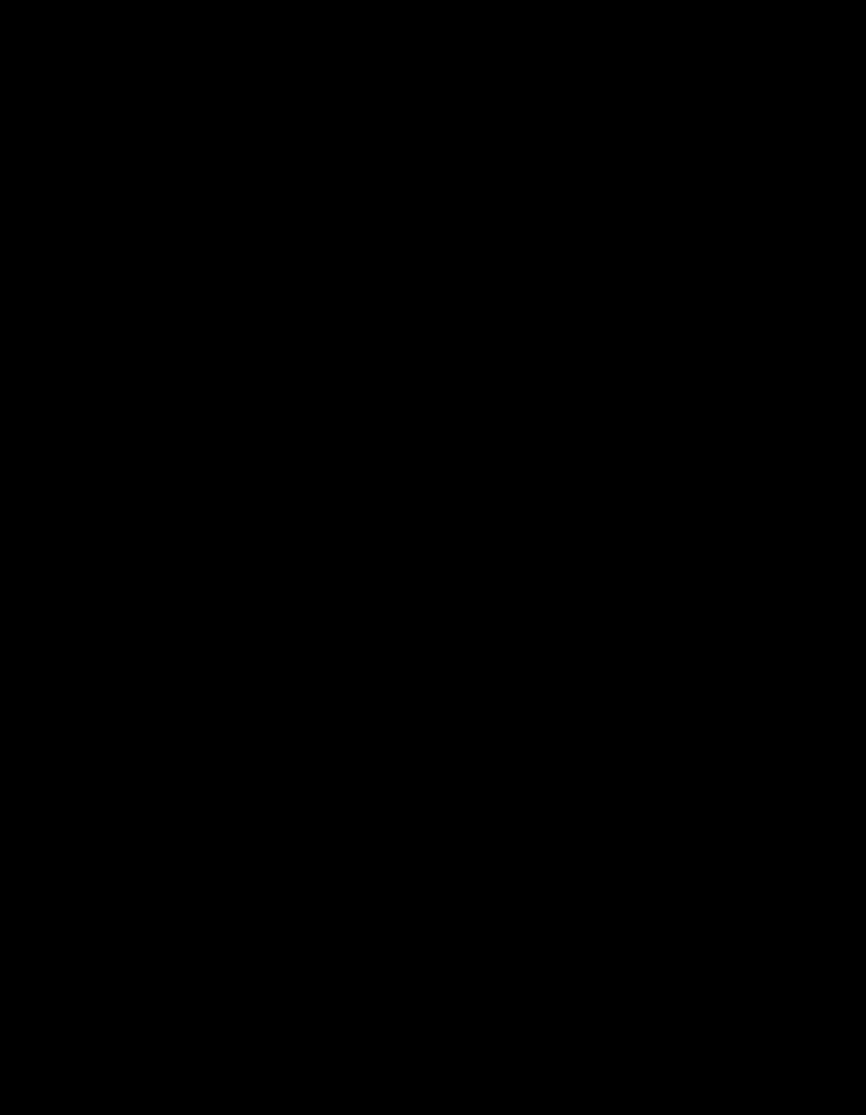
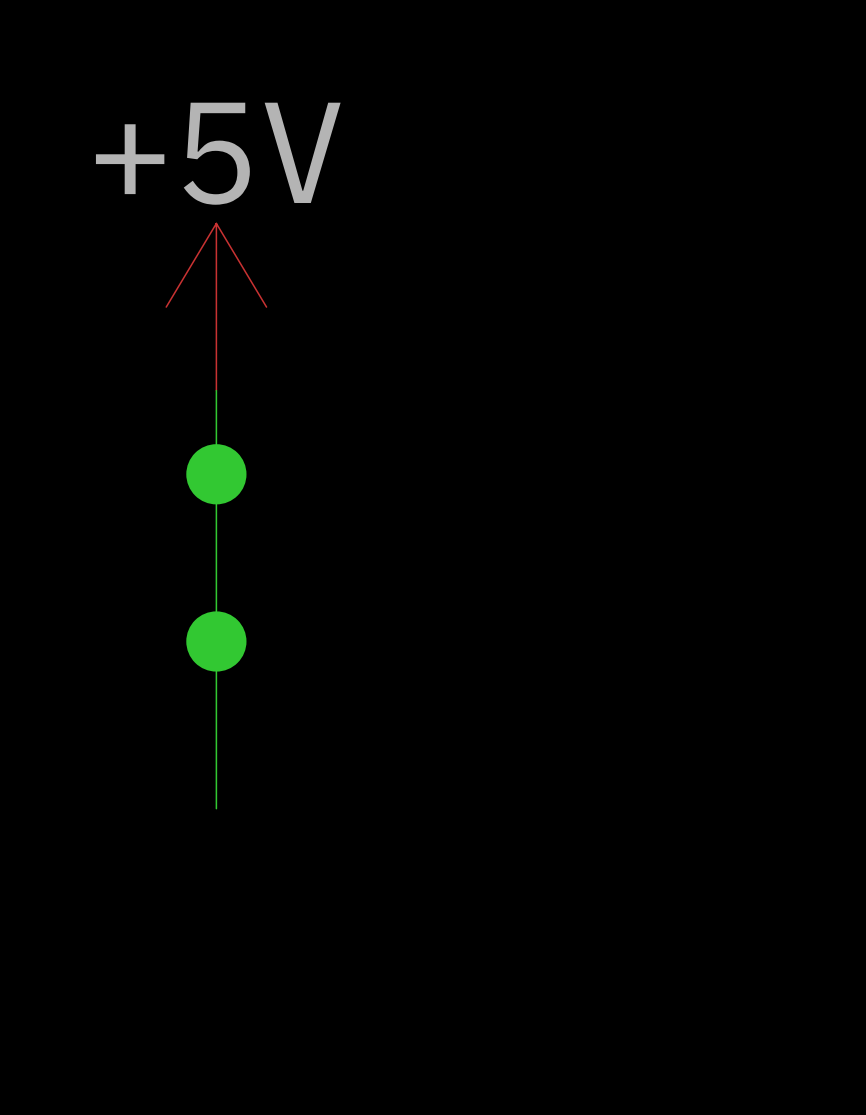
power symbol: none -> +5V (216, 307)
wire: none -> (216, 390) (216, 808)
junction: none -> (216, 474)
junction: none -> (216, 641)

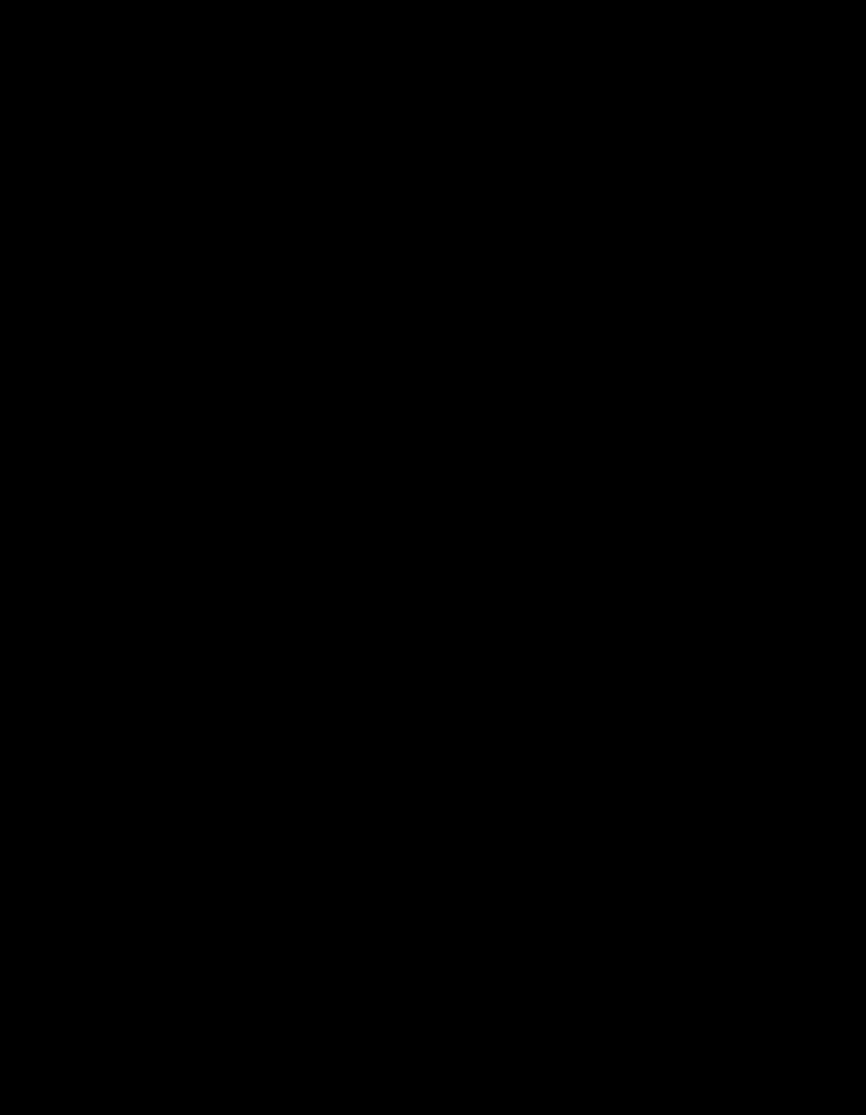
power symbol: +5V (216, 307) -> none
wire: (216, 390) (216, 808) -> none
junction: (216, 474) -> none
junction: (216, 641) -> none

